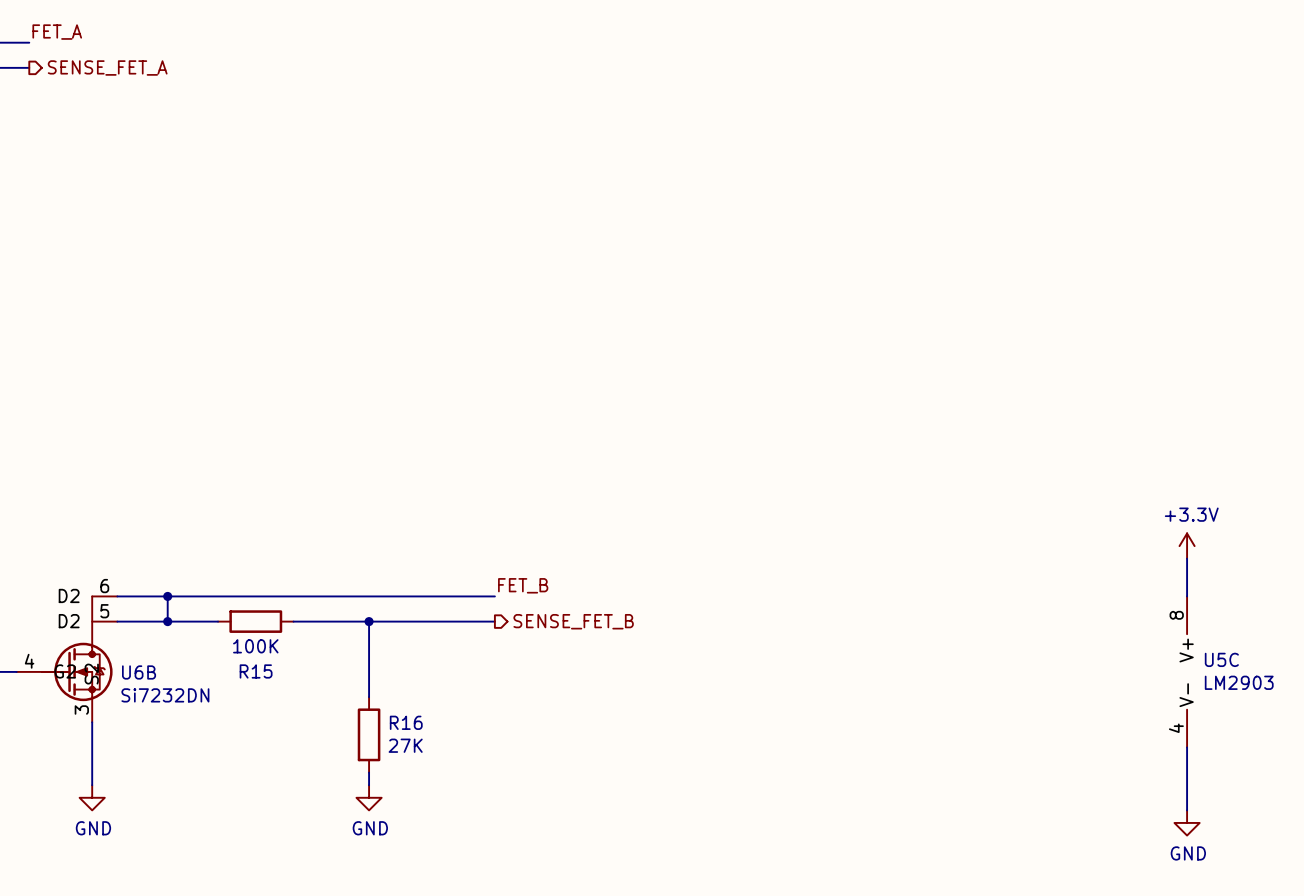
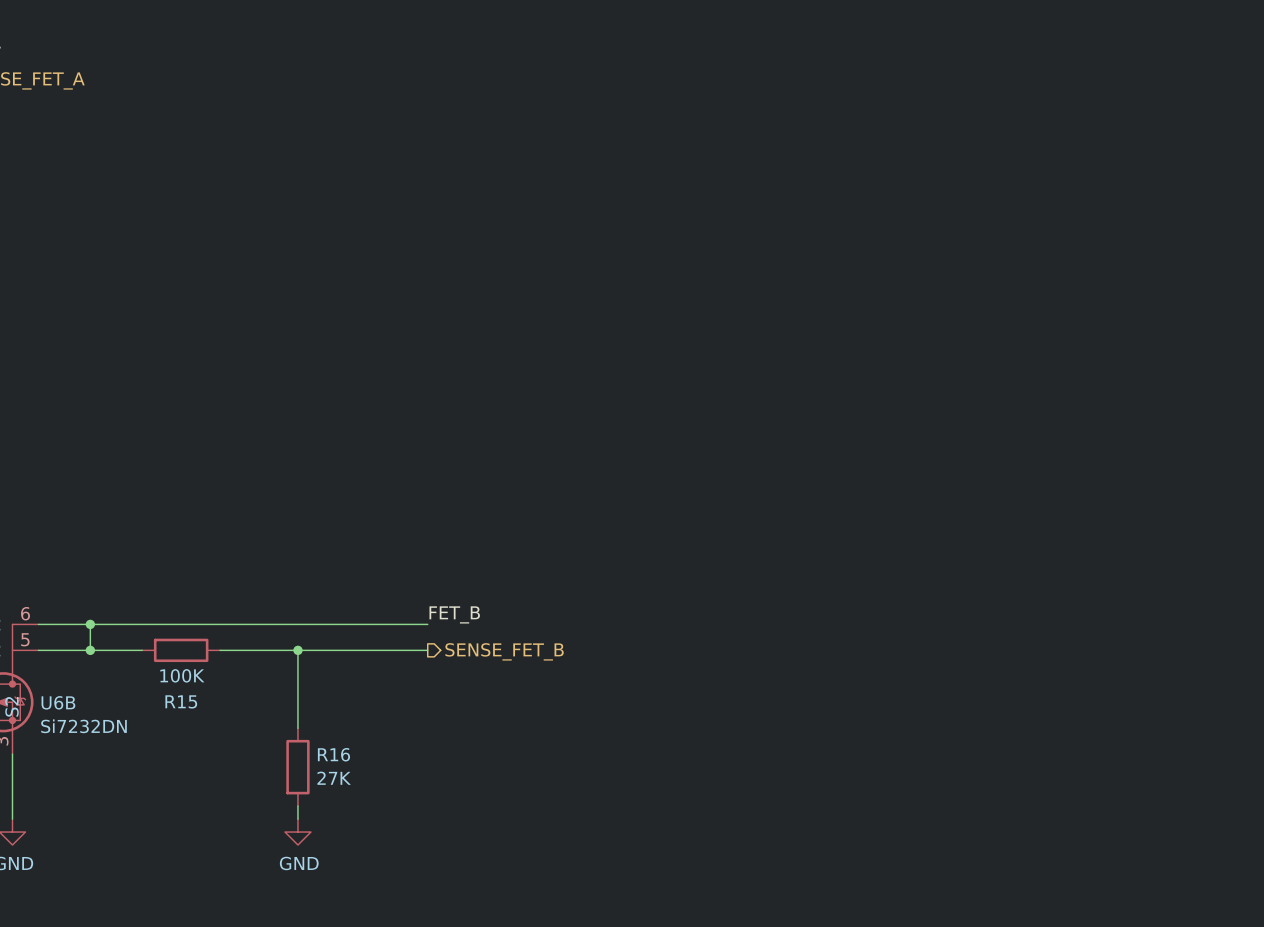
power symbol: +3.3V (1187, 546) -> none
wire: (1187, 558) (1187, 596) -> none
U5C: LM2903 (1187, 671) -> none
wire: (1187, 747) (1187, 810) -> none
power symbol: GND (1187, 822) -> none

